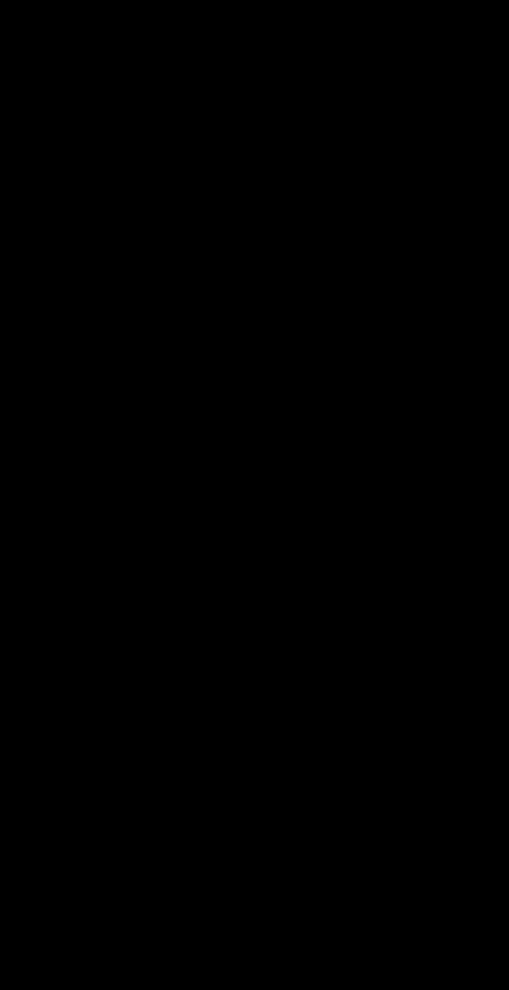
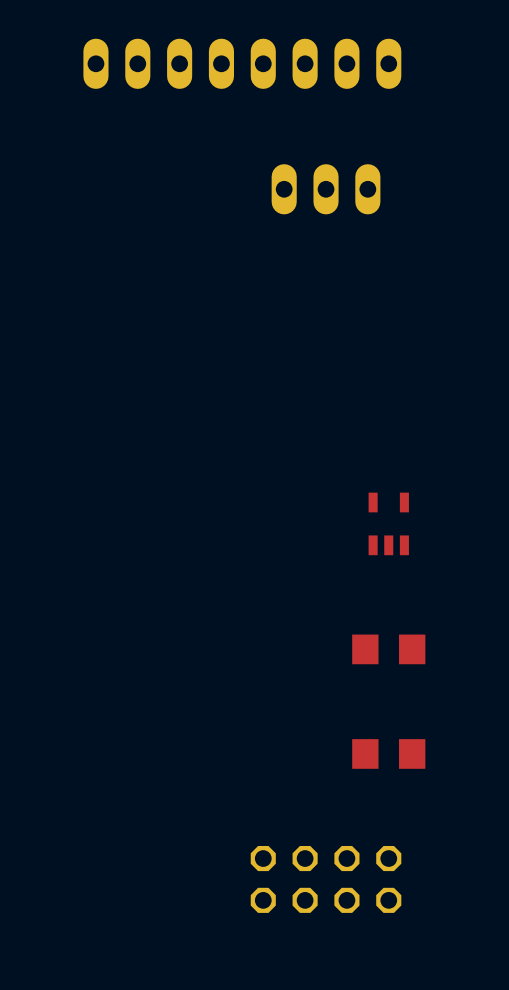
part: none -> (242, 63)
part: none -> (326, 189)
part: none -> (388, 523)
part: none -> (388, 649)
part: none -> (388, 753)
part: none -> (326, 879)

